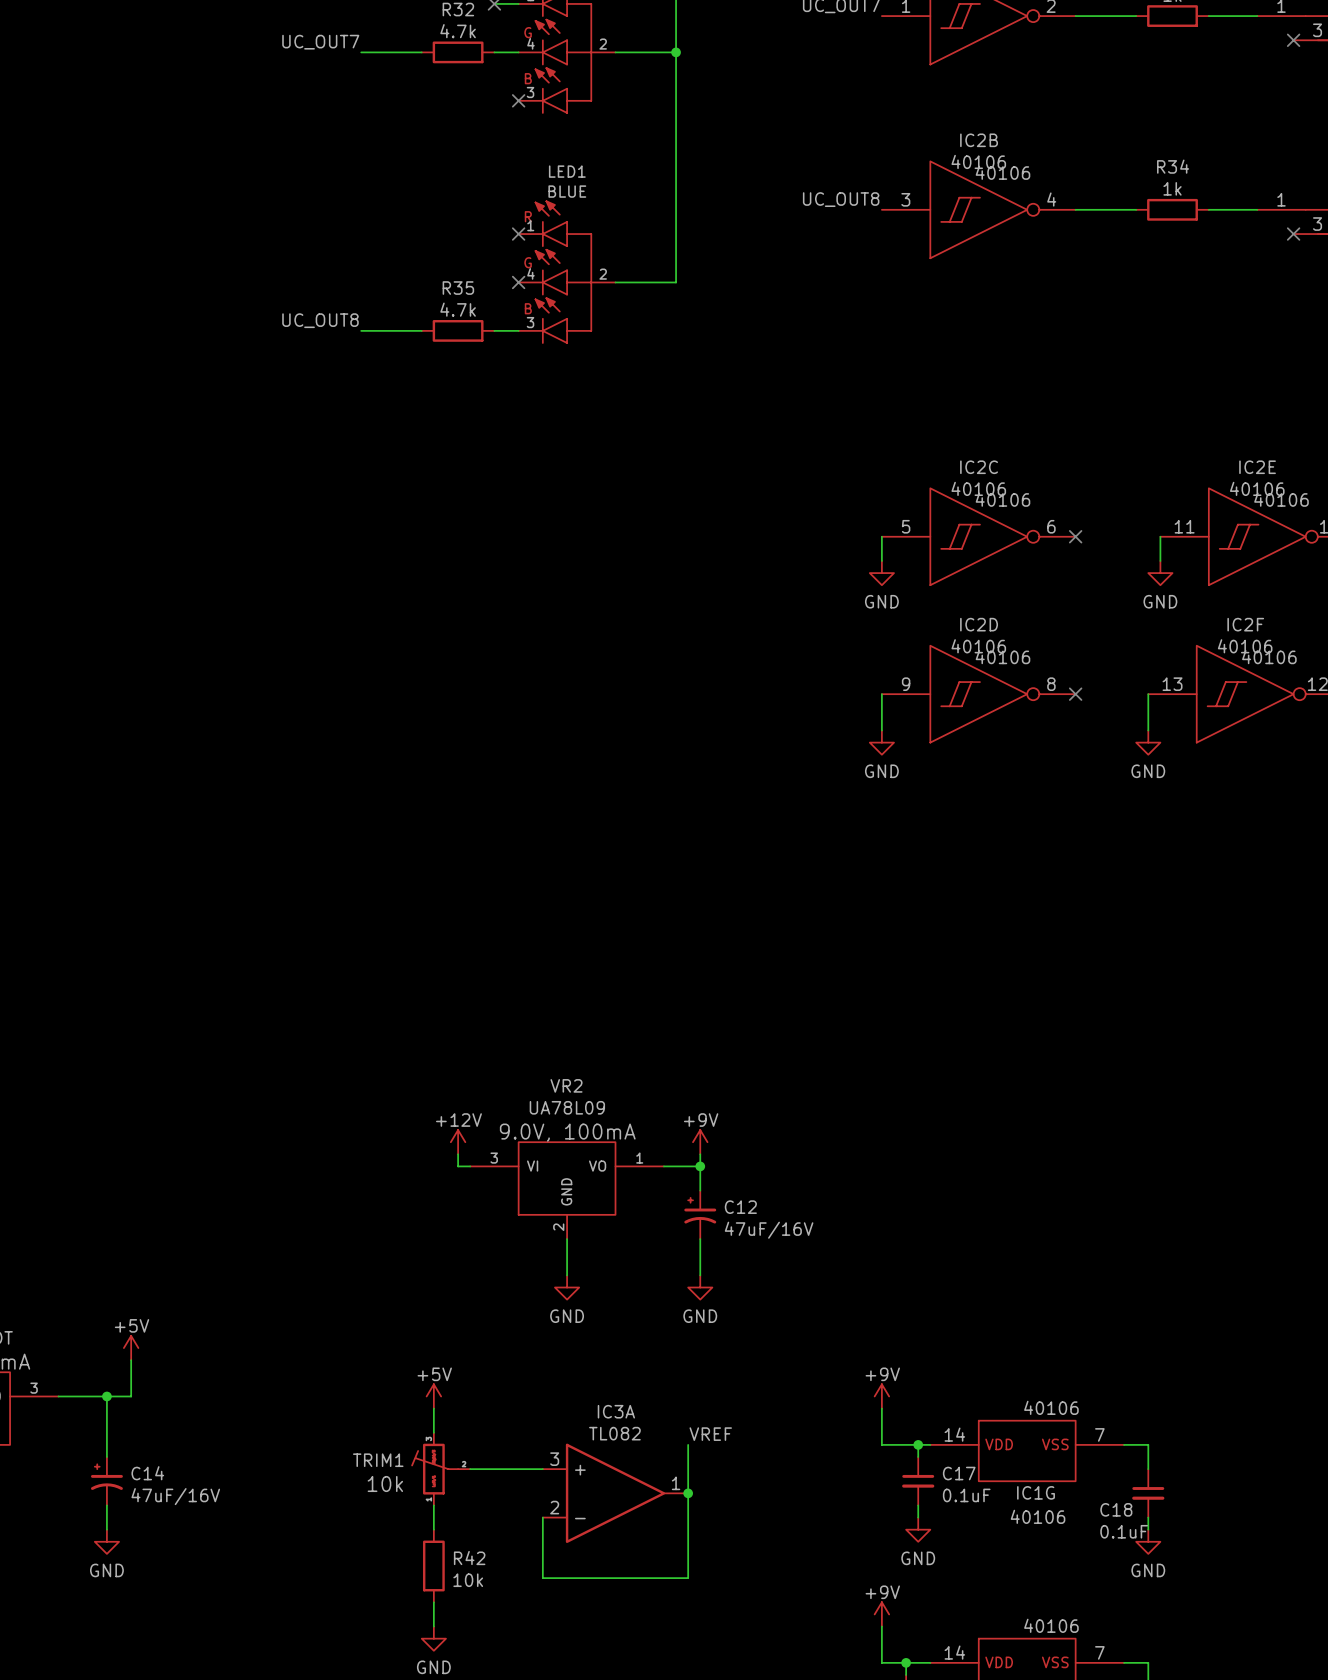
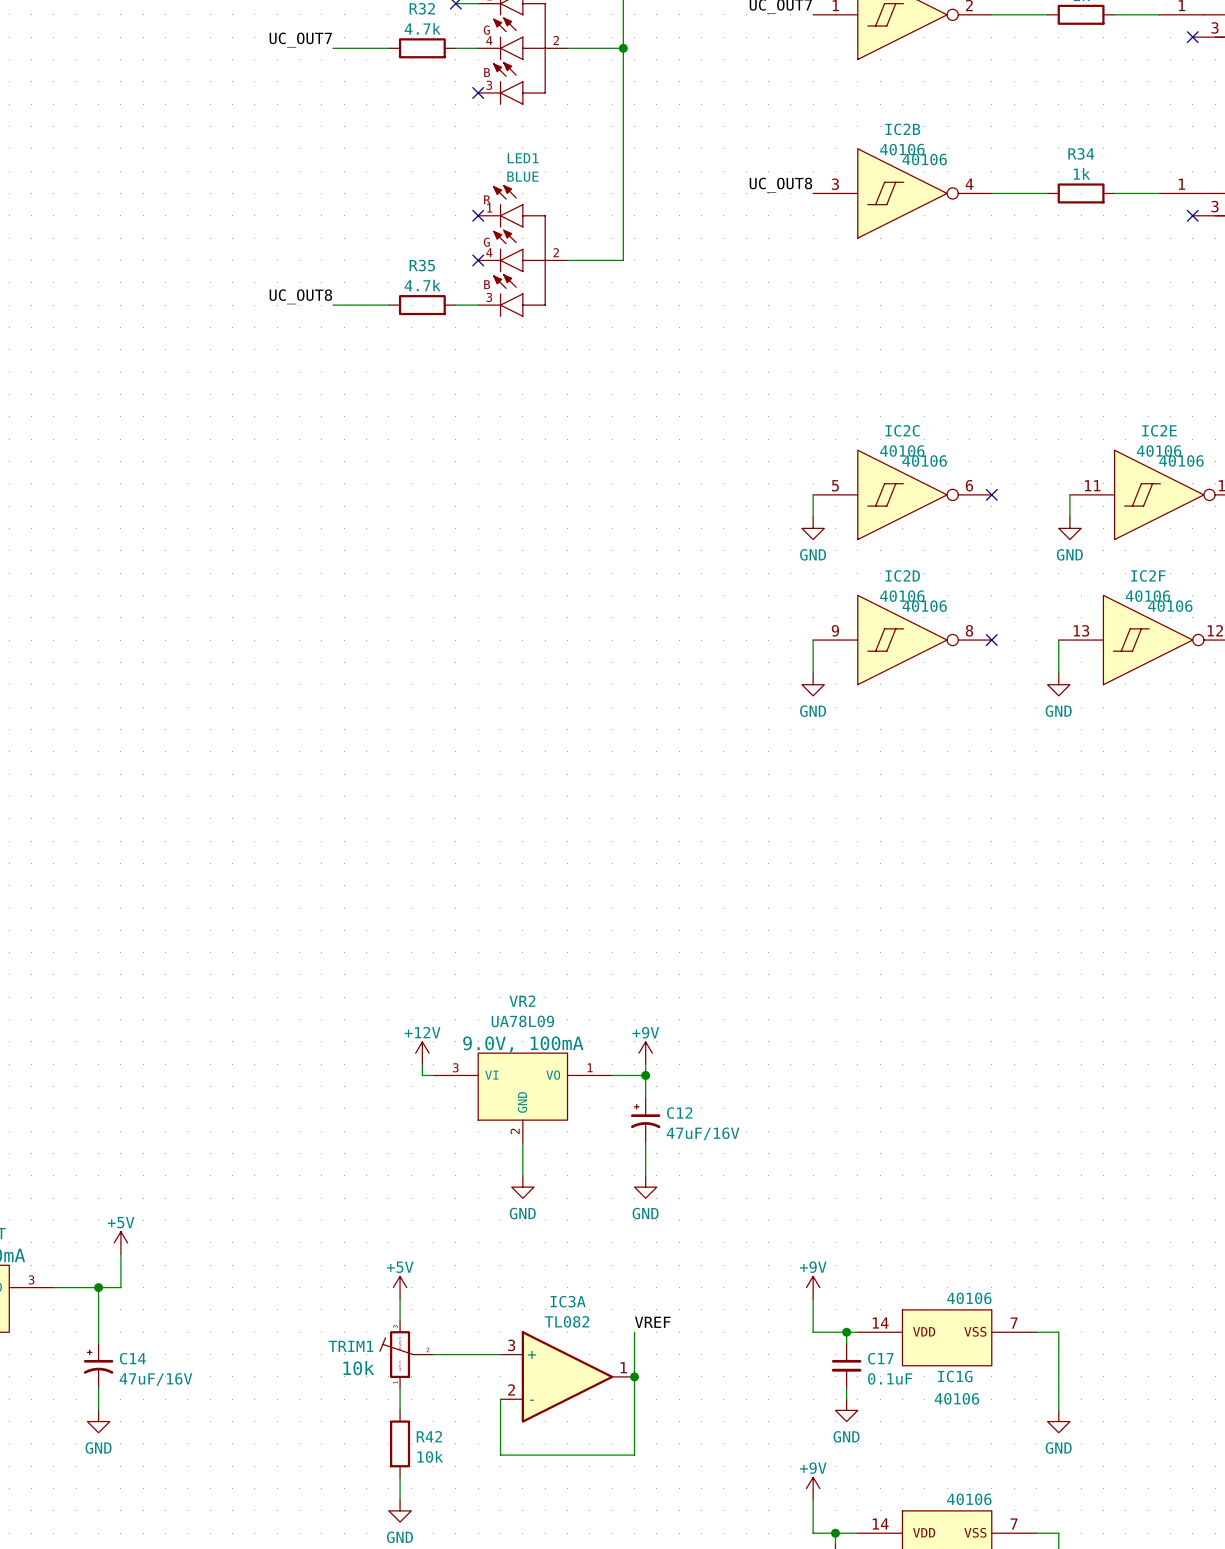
C18: (1148, 1493) -> none

